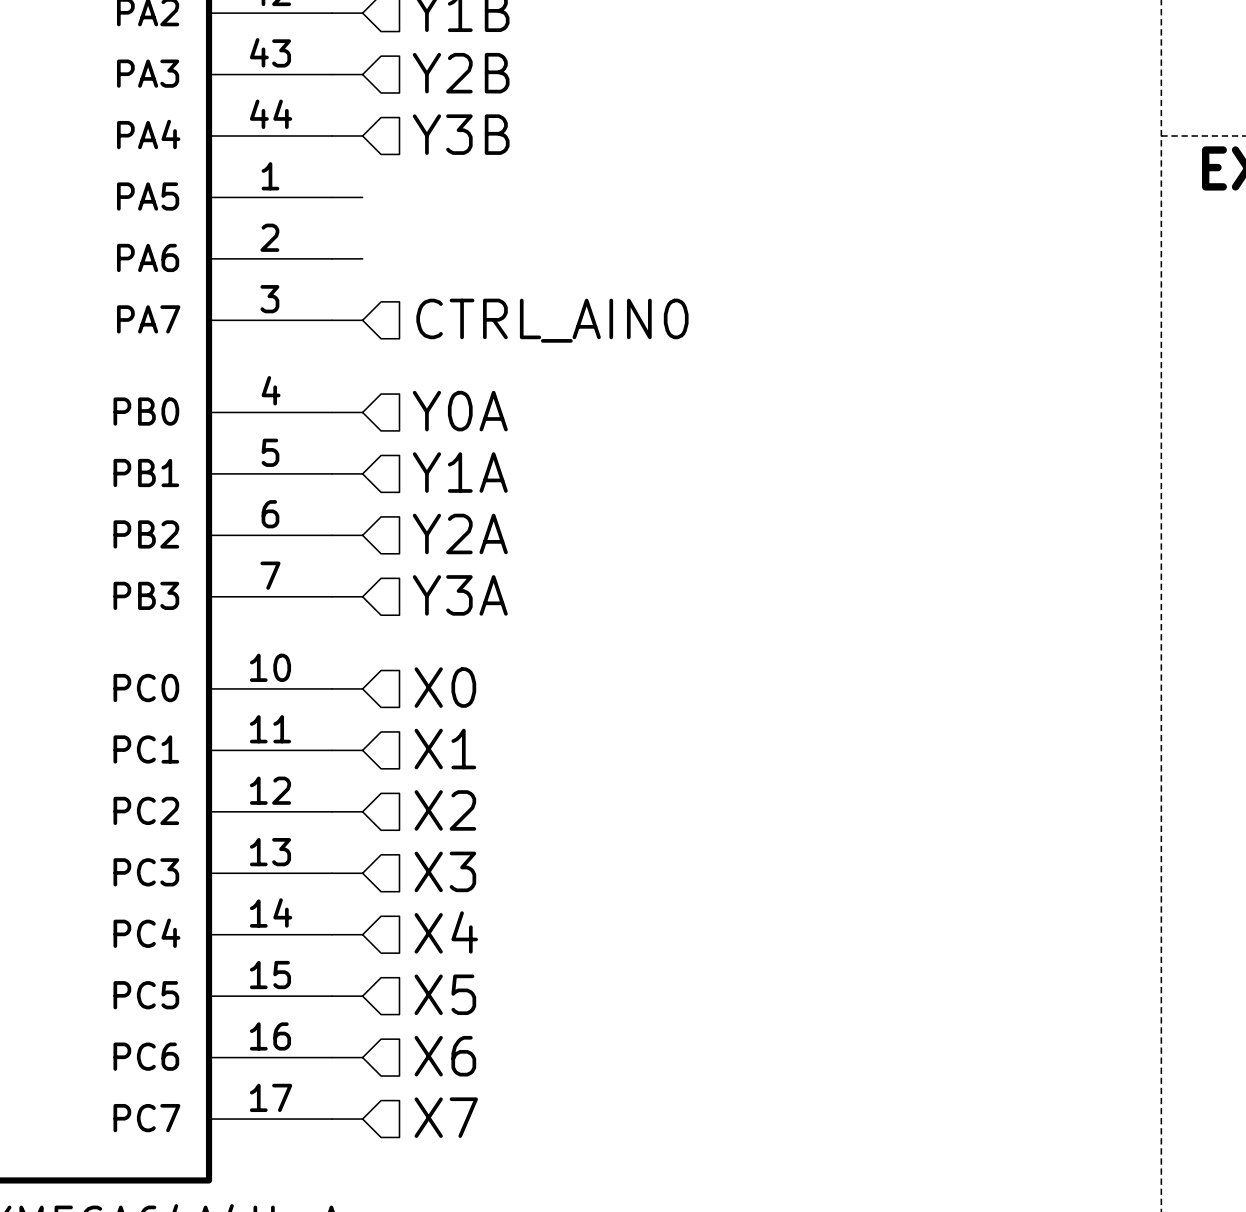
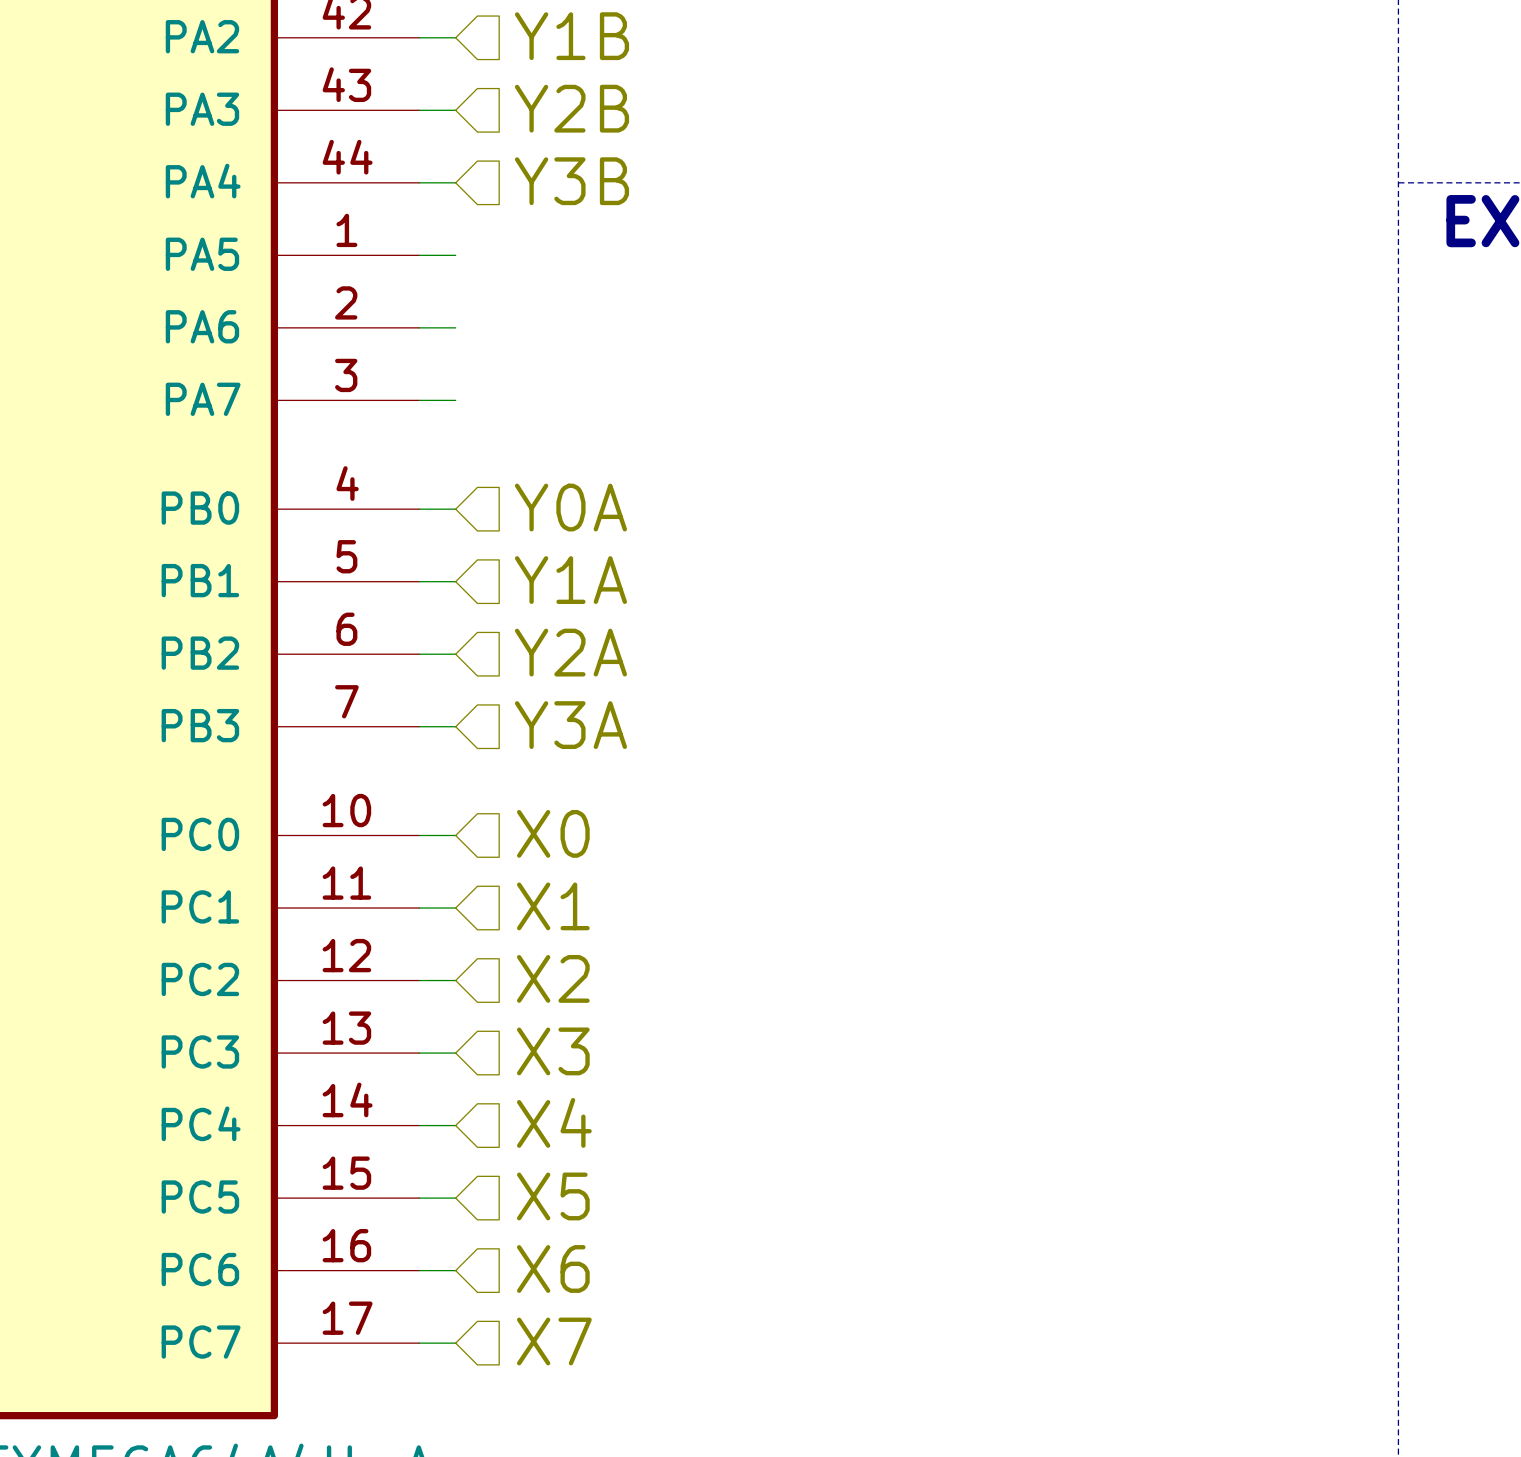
hierarchical label: CTRL_AIN0 (552, 320) -> none

